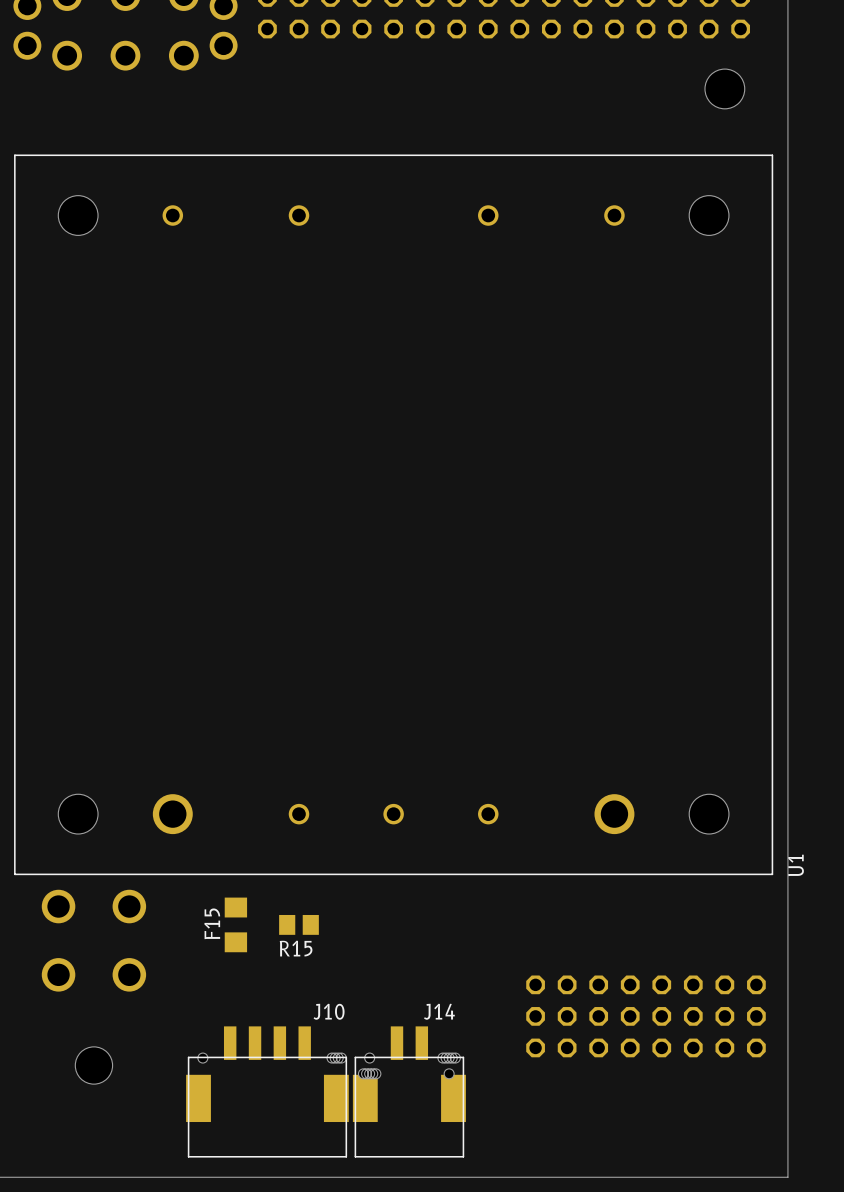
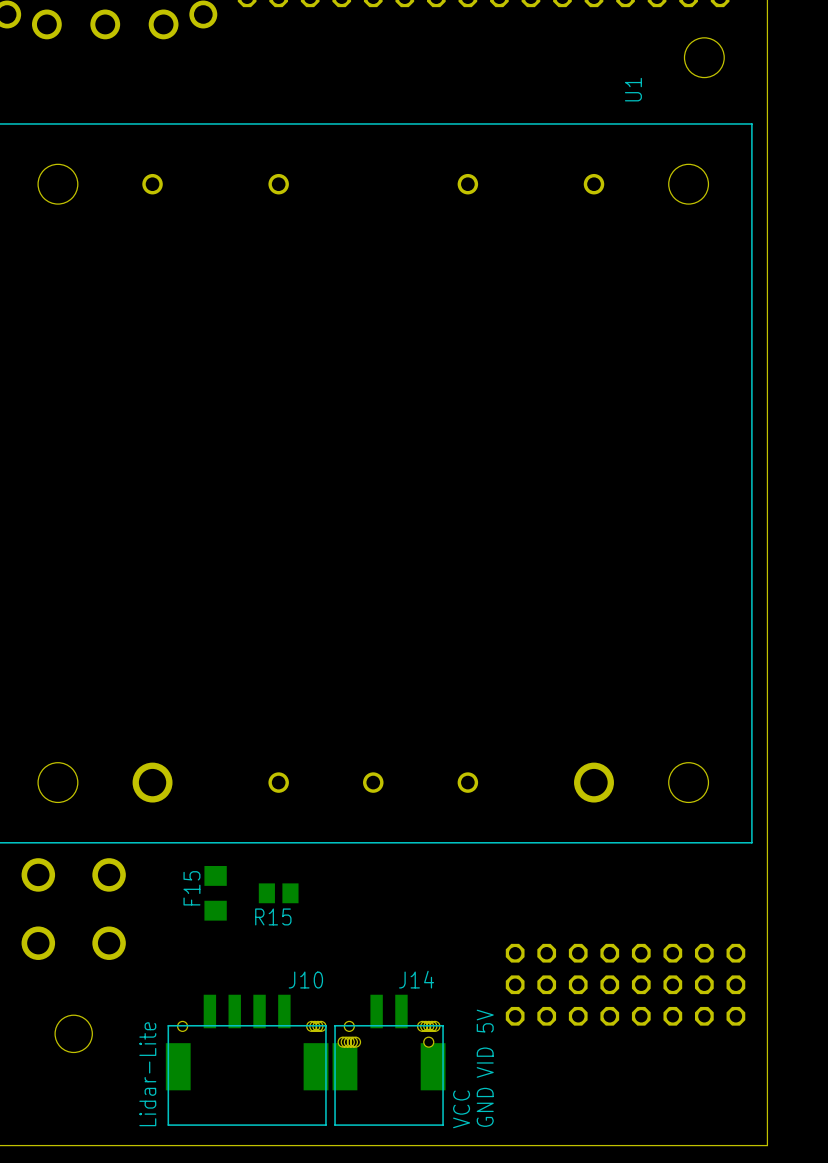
U1 name position: U1 (795, 865) -> U1 (633, 89)
text: none -> VID 5V (485, 1043)
text: none -> Lidar-Lite (147, 1074)
text: none -> GND (485, 1107)
text: none -> VCC (461, 1109)

